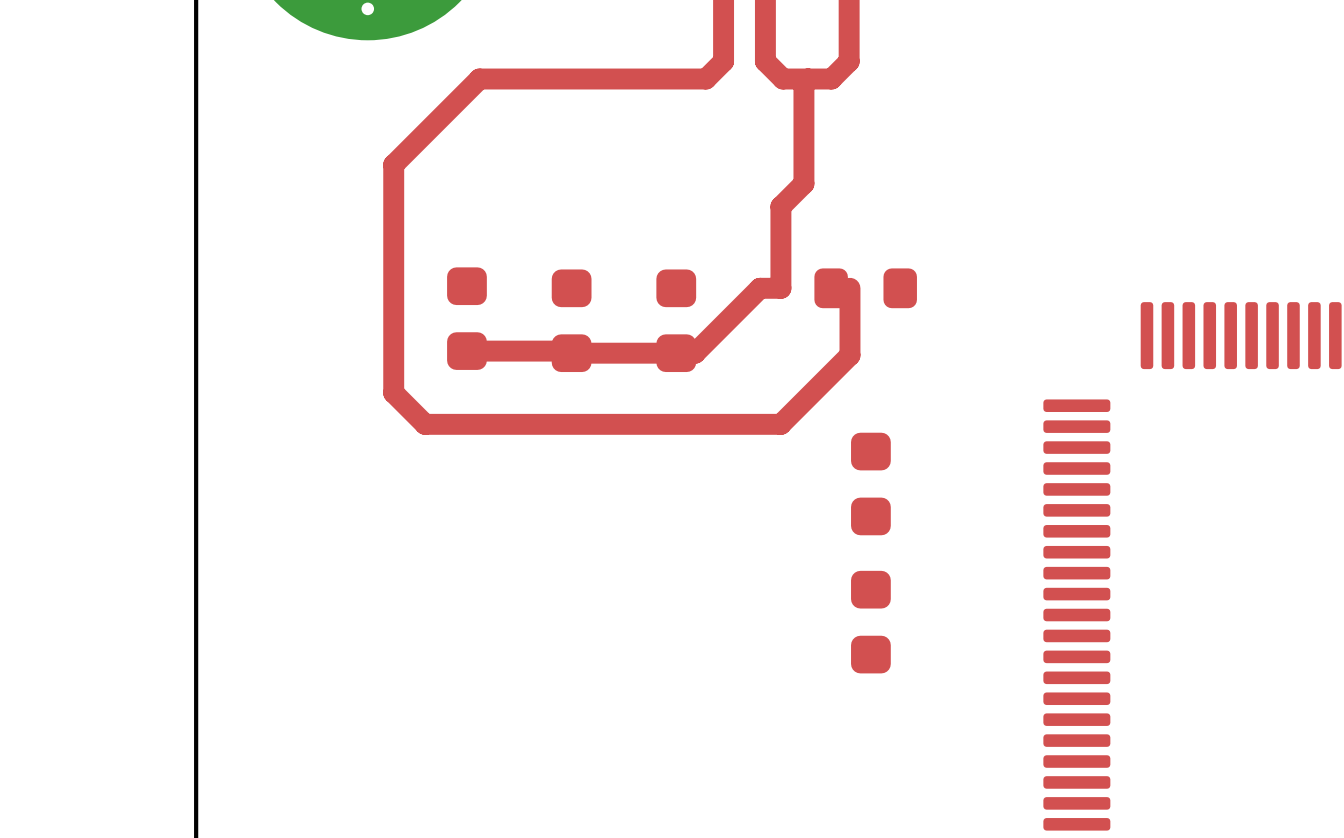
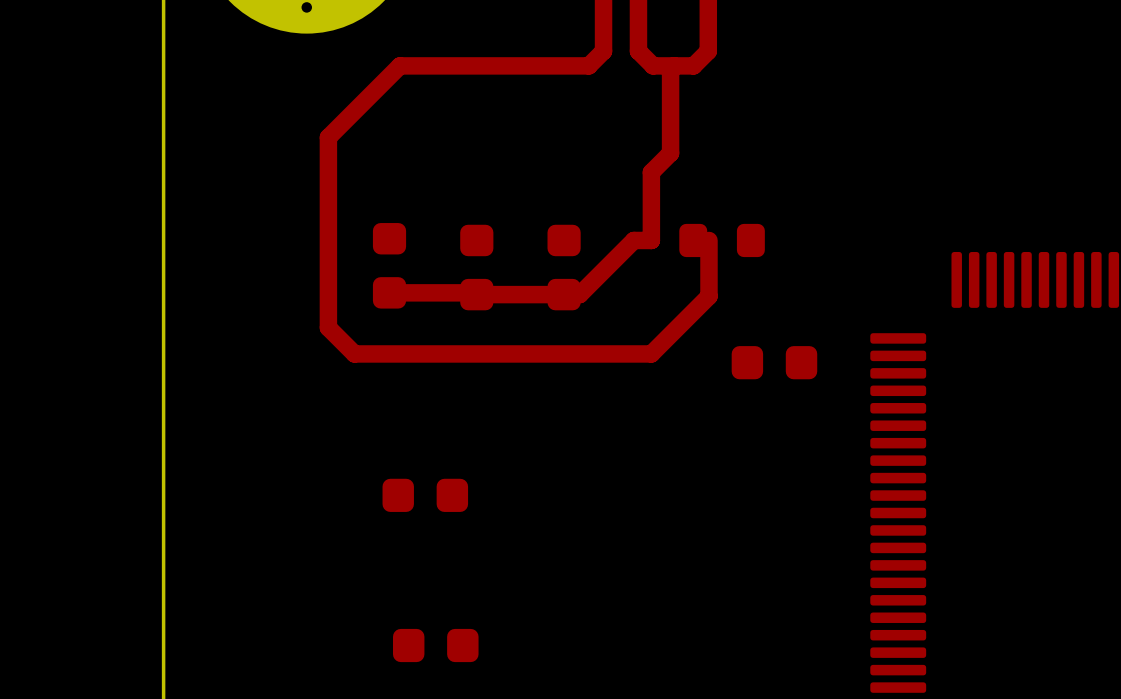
part rotation: 0° (870, 483) -> 90° clockwise (774, 362)
part position: (870, 483) -> (774, 362)
part: none -> (425, 495)
part: (870, 622) -> none
part: none -> (435, 645)

